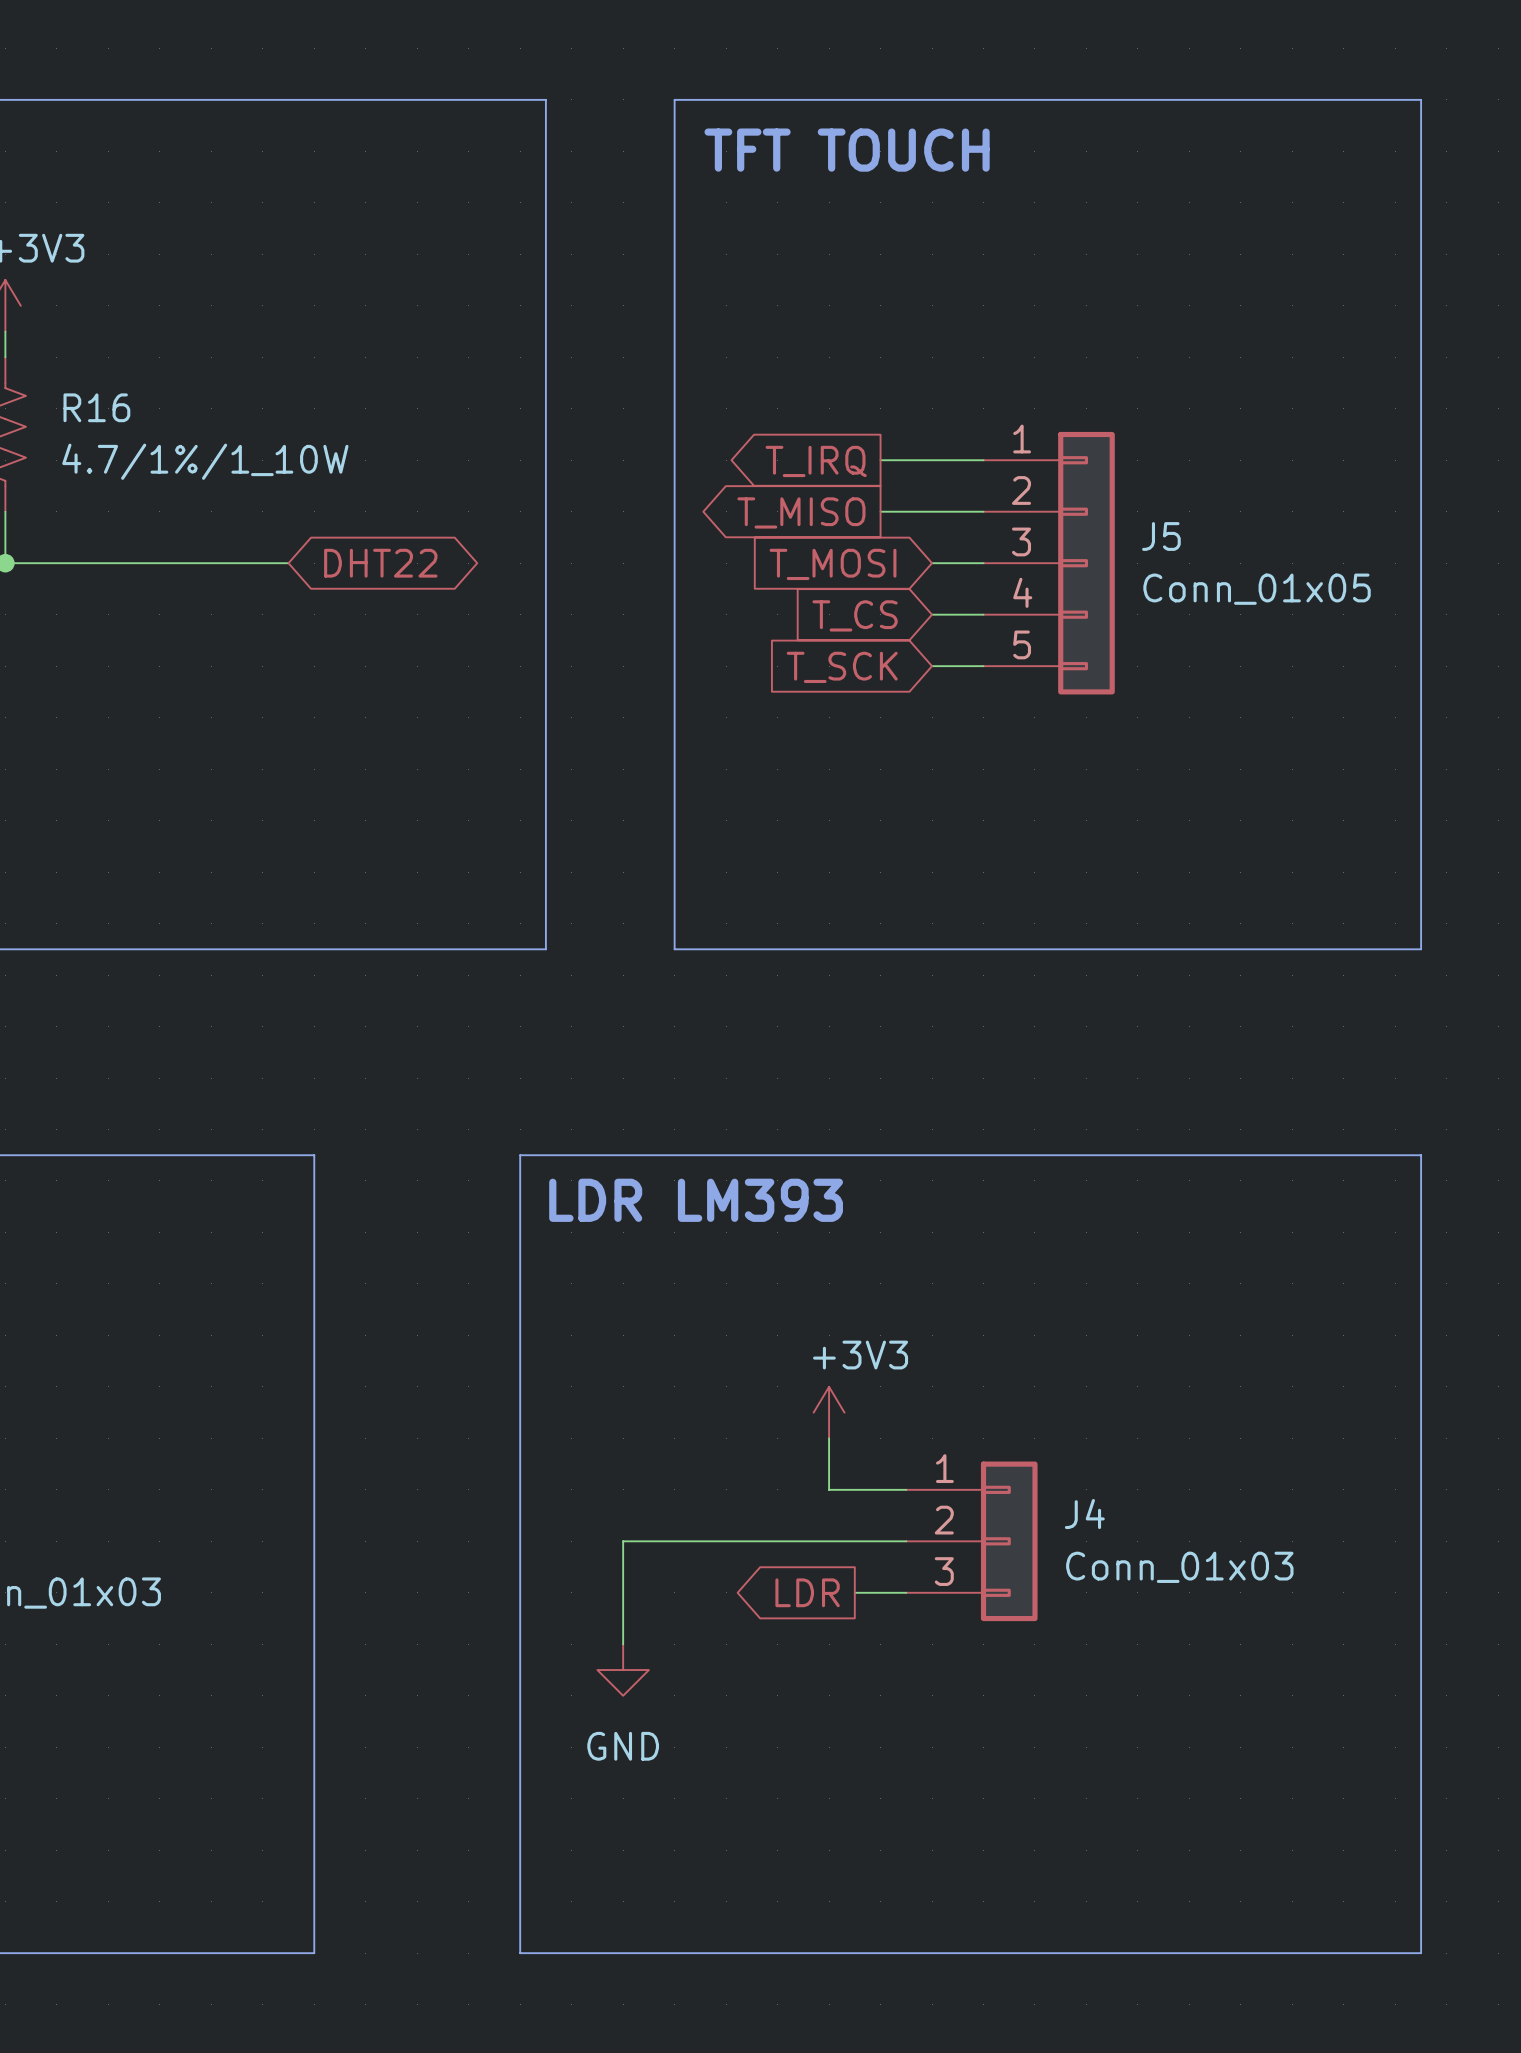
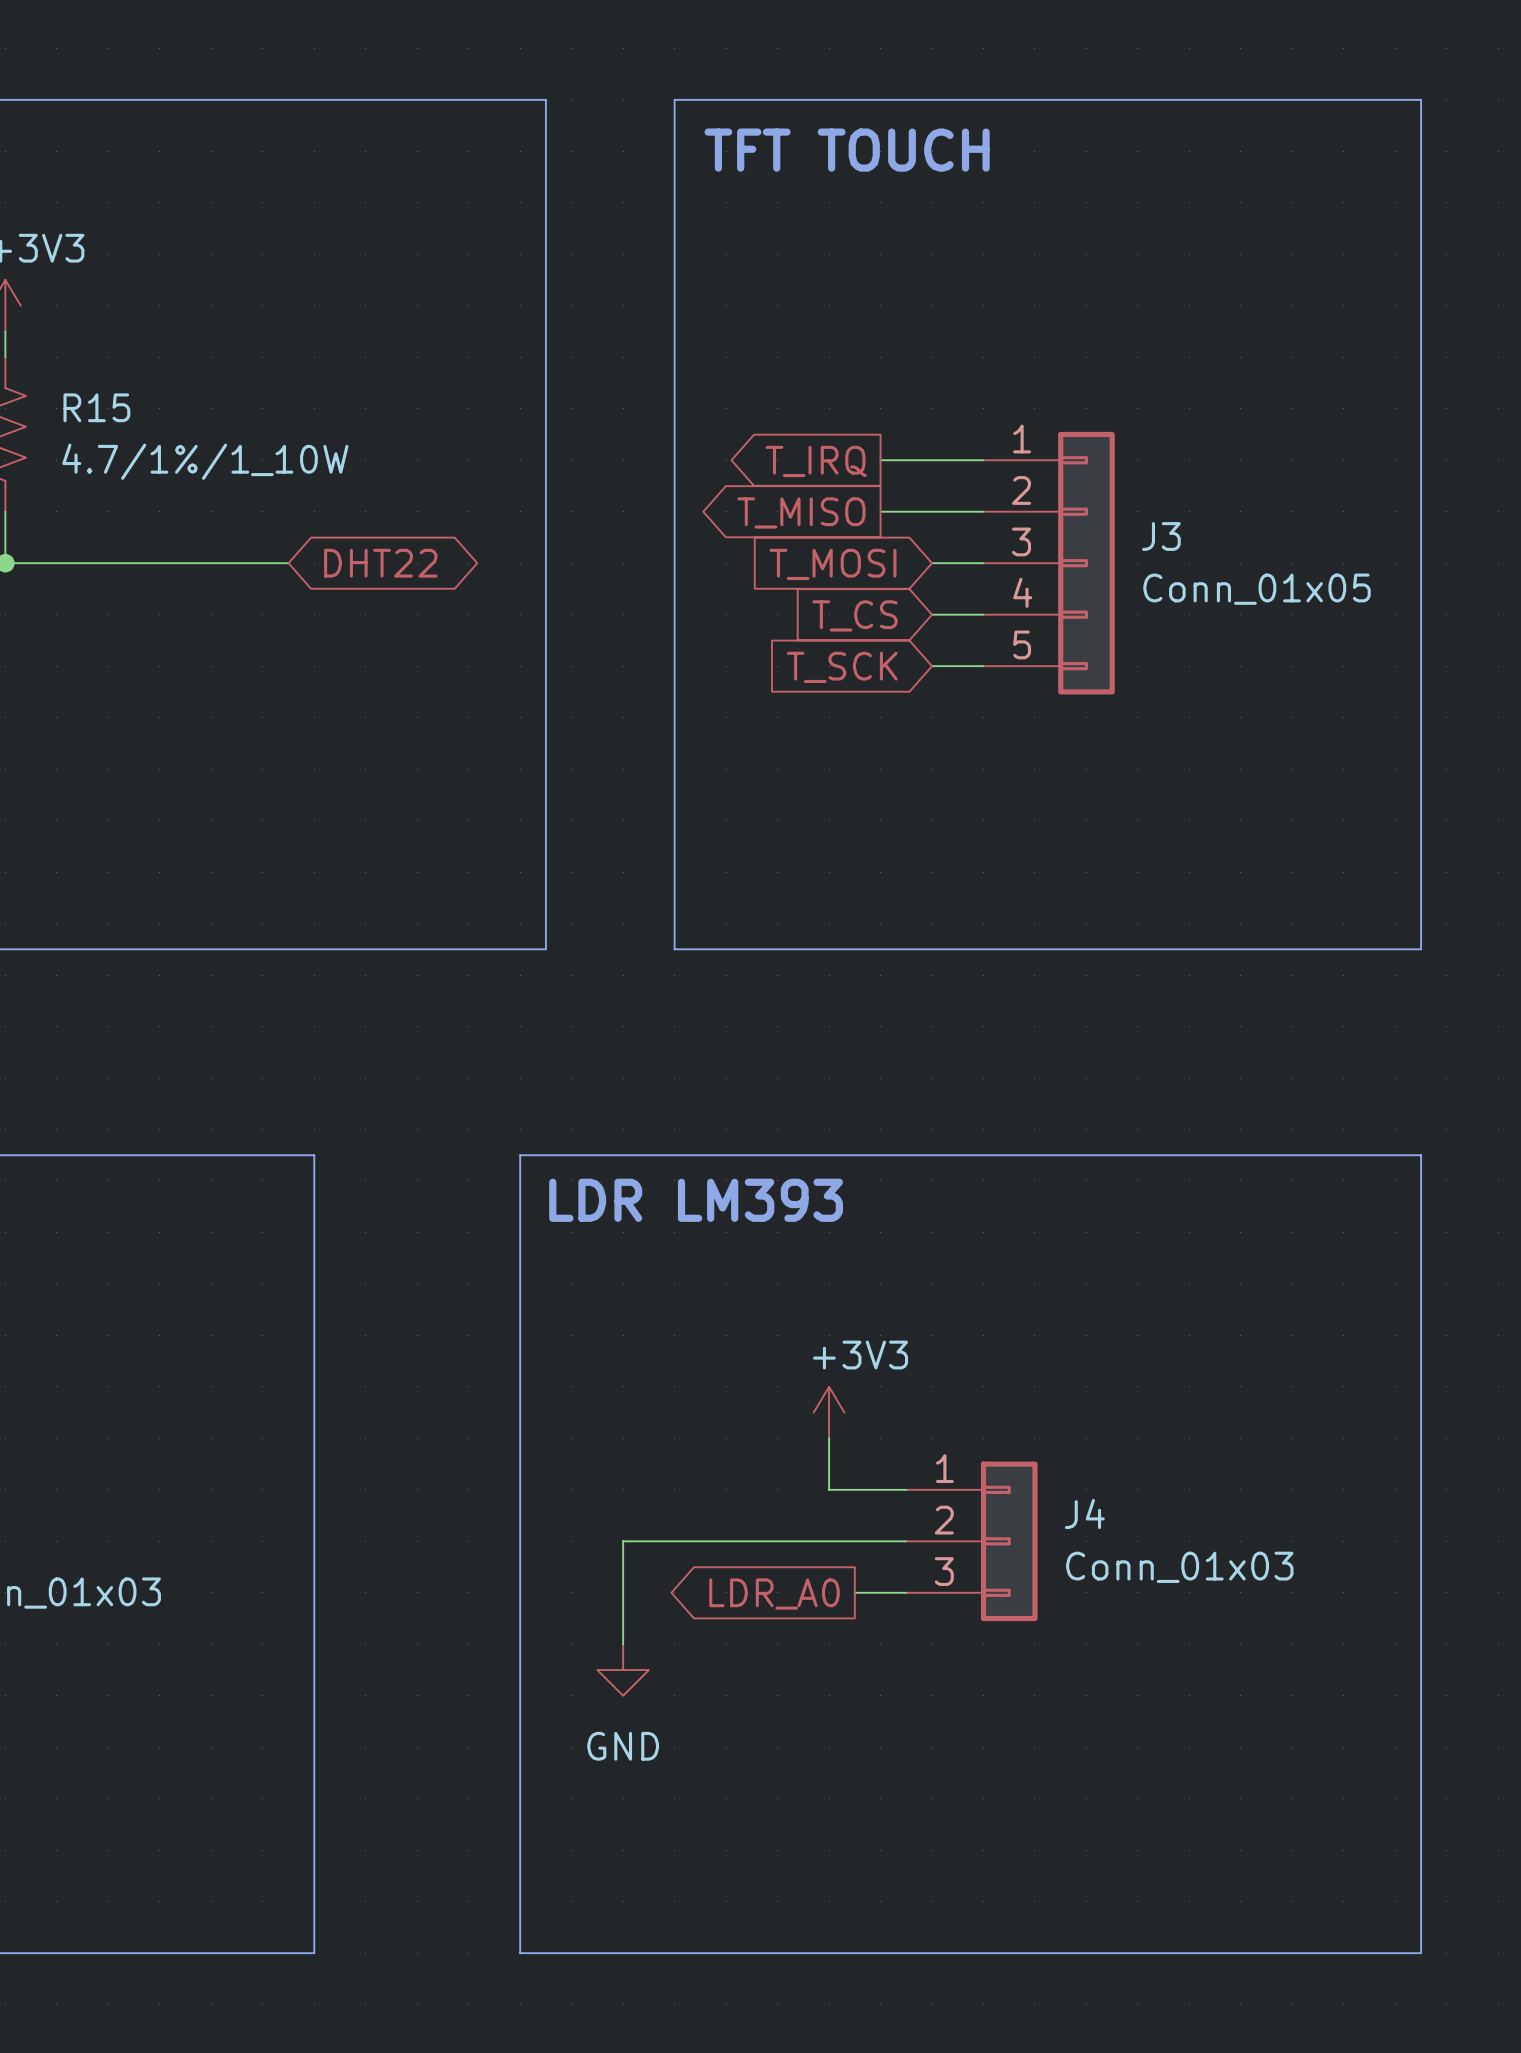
R16 name: R16 (96, 407) -> R15 (96, 407)
J5 name: J5 (1161, 536) -> J3 (1161, 536)
global label: LDR (807, 1592) -> LDR_A0 (774, 1594)

